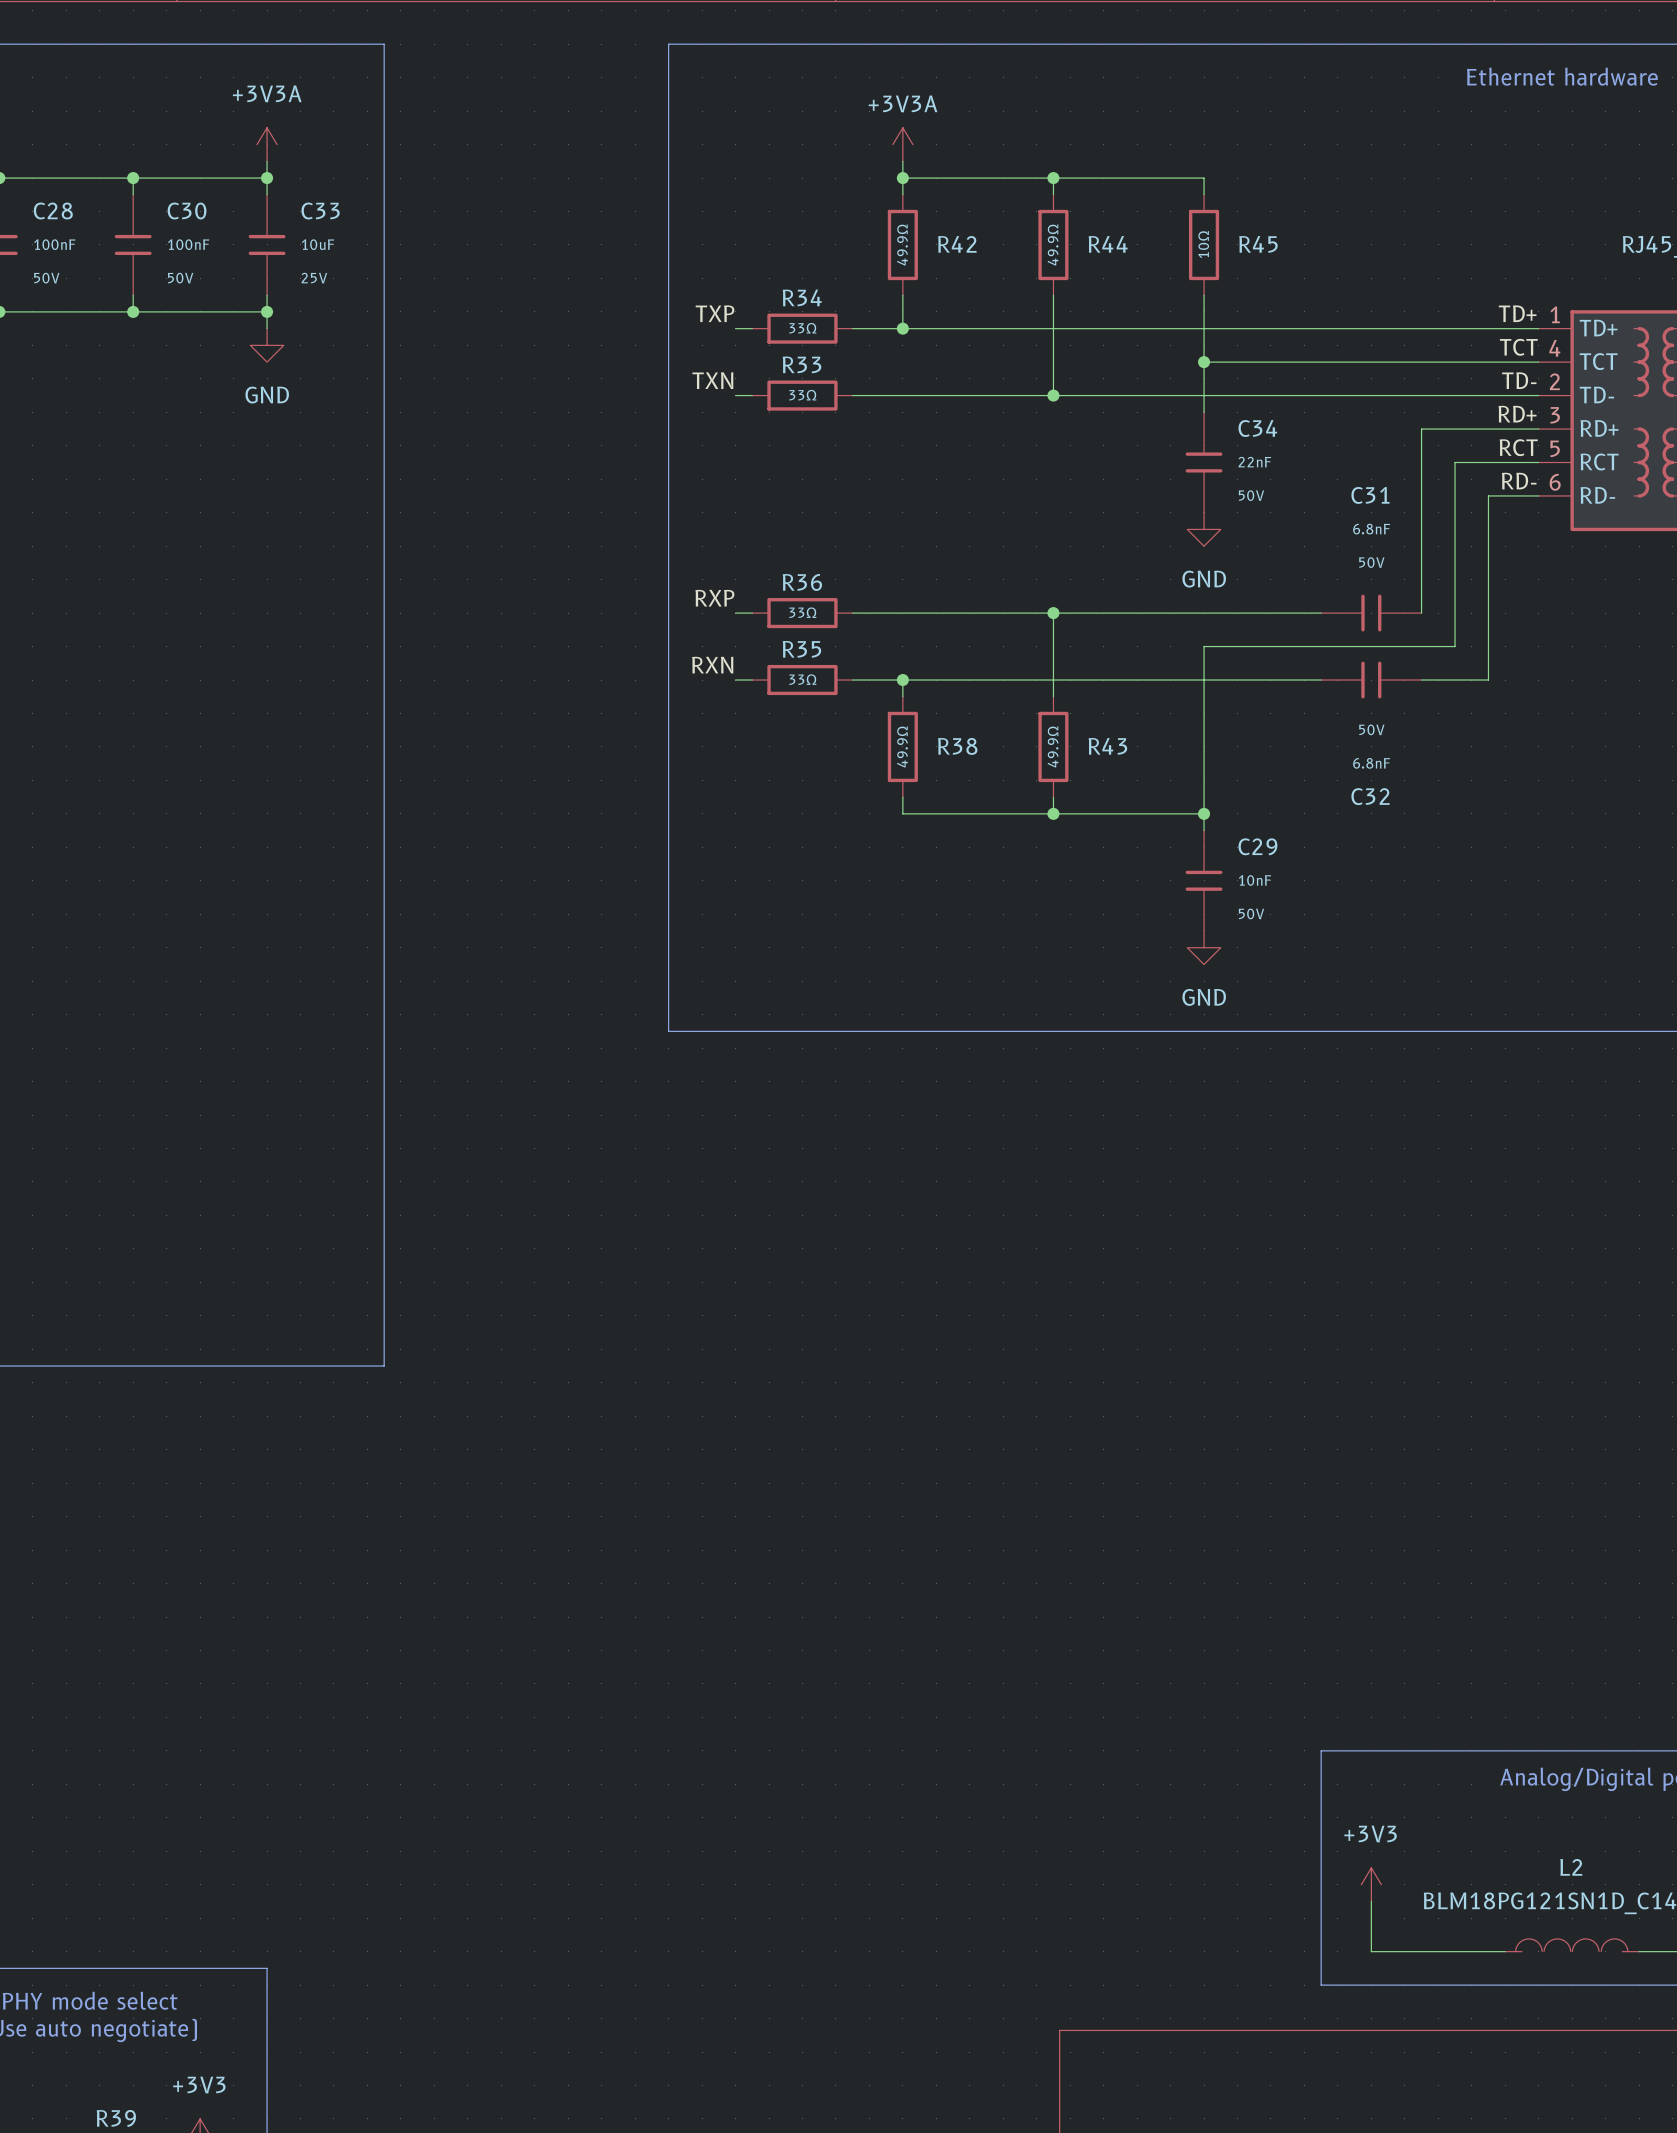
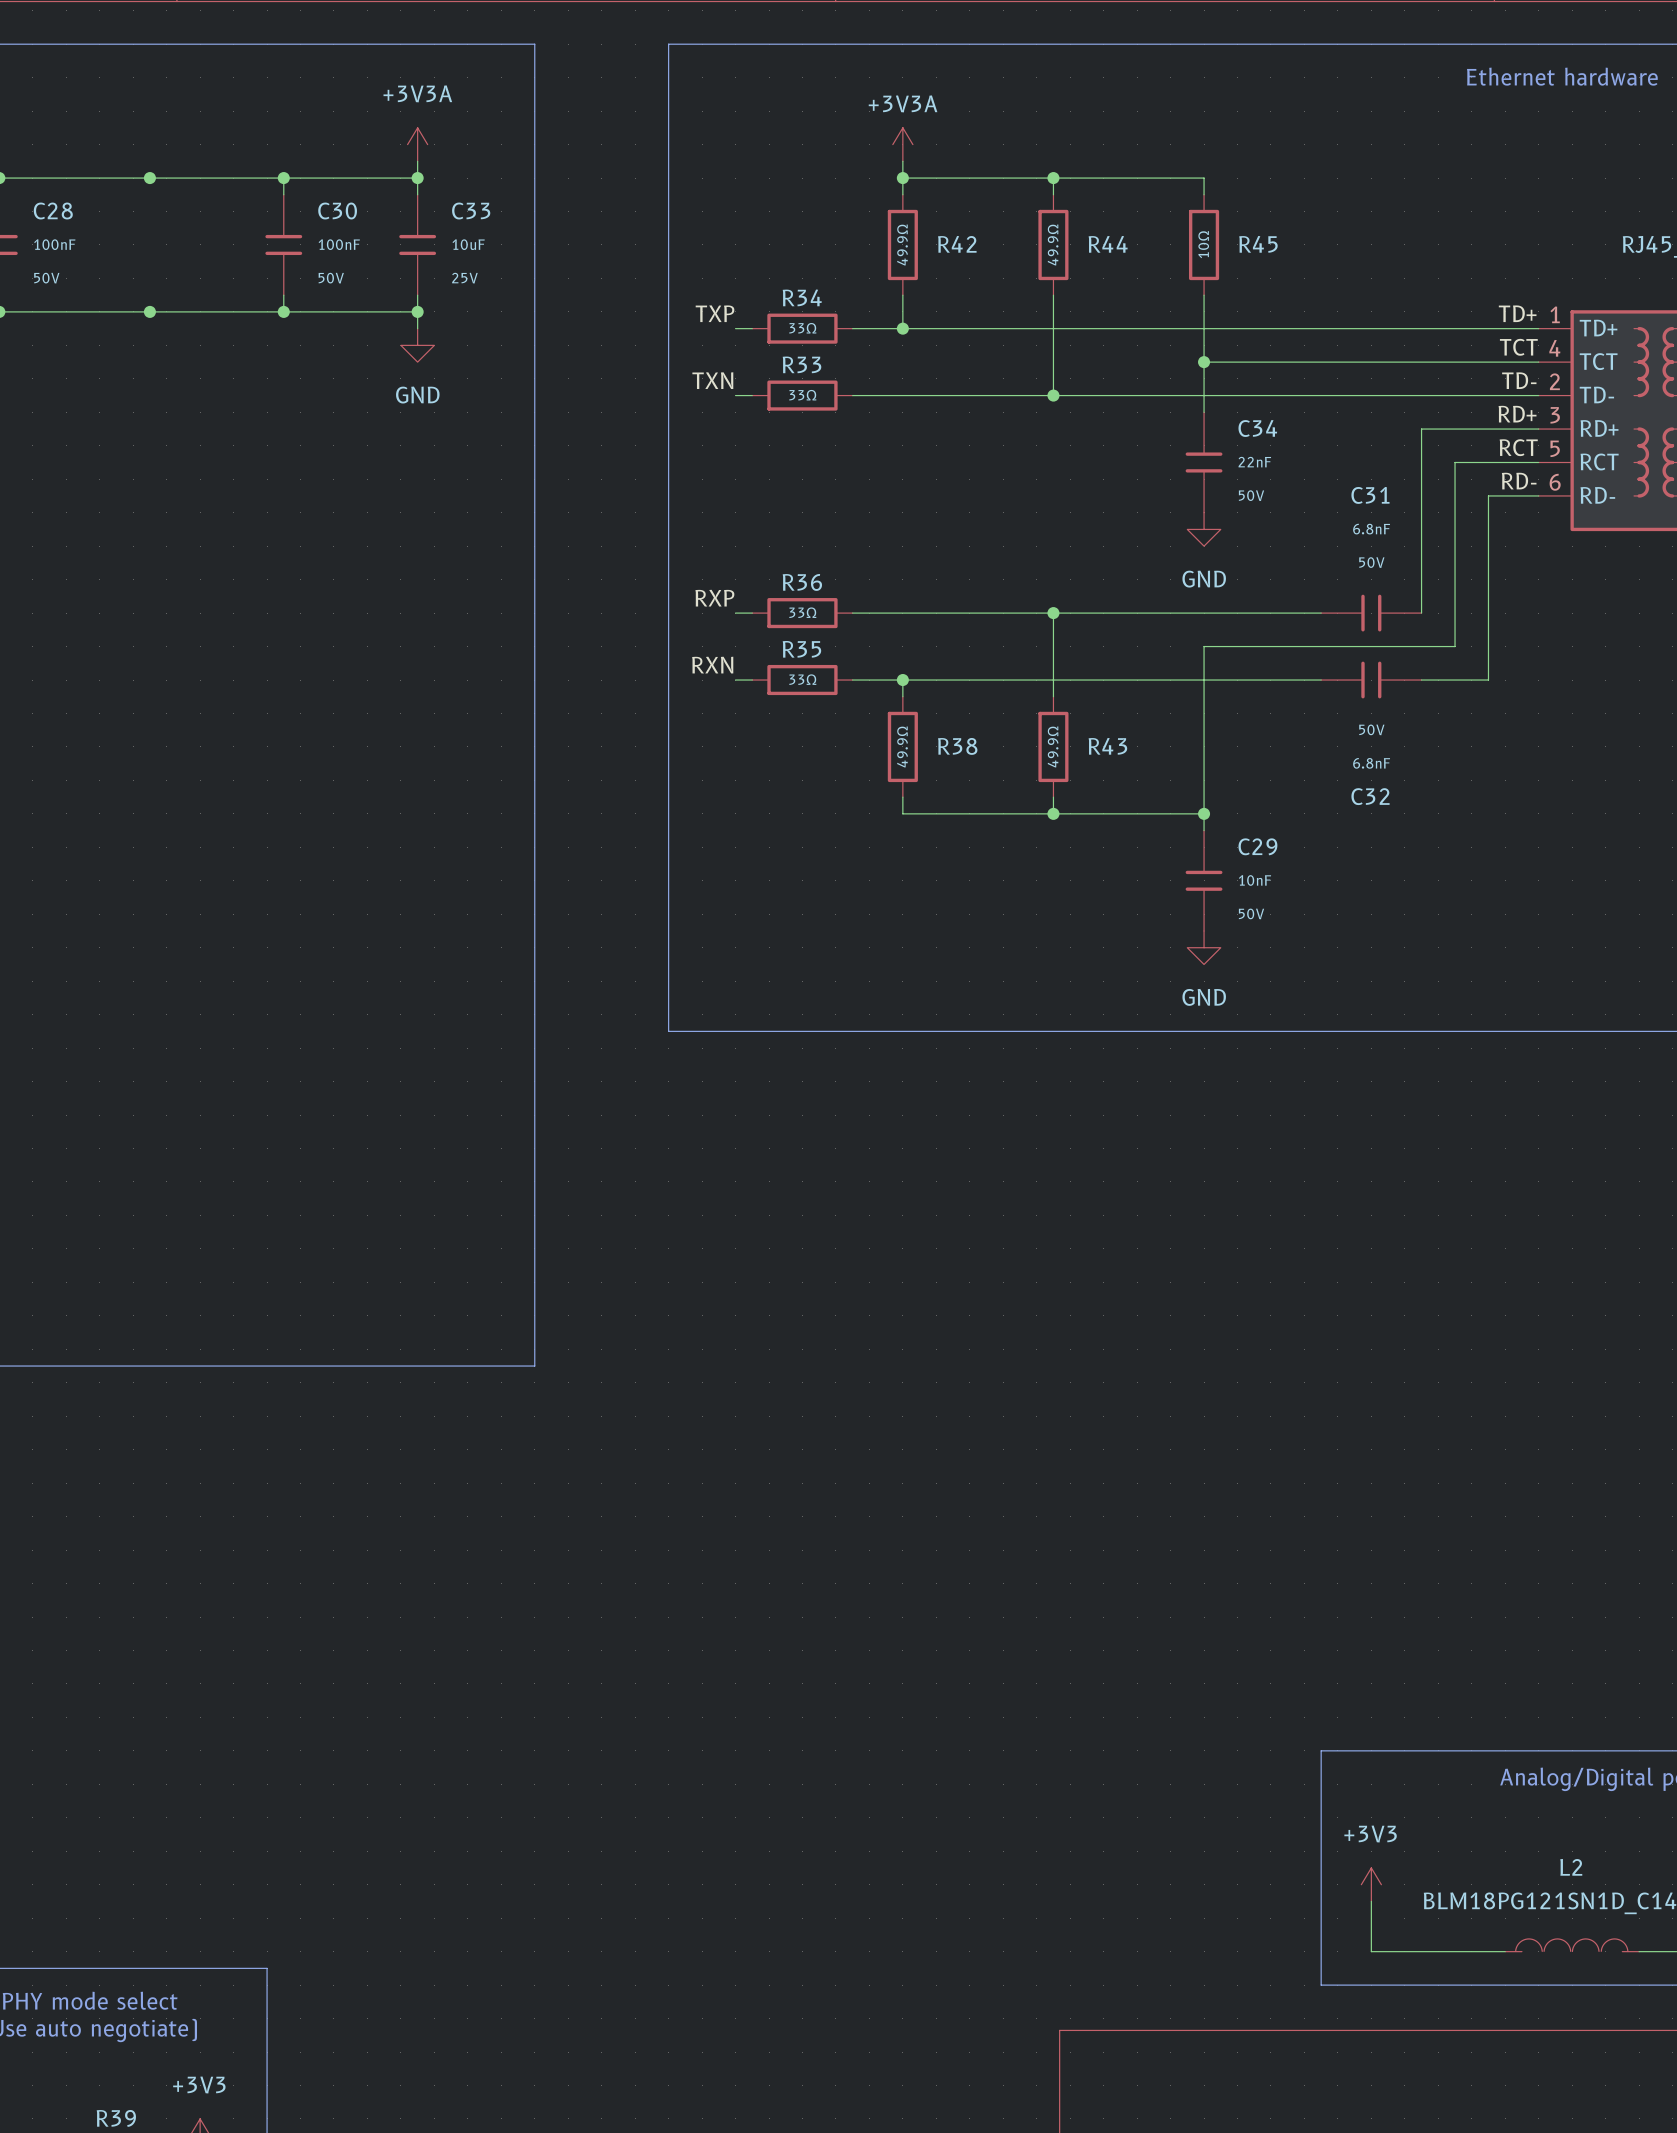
line: (384, 44) (384, 1366) -> (384, 44) (534, 44) (534, 1366) (384, 1366)
power symbol position: +3V3A (267, 144) -> +3V3A (417, 144)
wire: (267, 161) (267, 194) -> (417, 161) (417, 194)
wire: (133, 178) (133, 194) -> (283, 178) (283, 194)
junction position: (133, 178) -> (149, 178)
wire: none -> (267, 178) (417, 178)
junction position: (267, 178) -> (283, 178)
junction: none -> (417, 178)
C30 position: (133, 244) -> (283, 244)
C33 position: (267, 244) -> (417, 244)
wire: (133, 295) (133, 311) -> (283, 295) (283, 311)
wire: (267, 295) (267, 328) -> (417, 295) (417, 328)
junction position: (133, 311) -> (149, 311)
wire: none -> (267, 311) (417, 311)
junction position: (267, 311) -> (283, 311)
junction: none -> (417, 311)
power symbol position: GND (267, 345) -> GND (417, 345)

